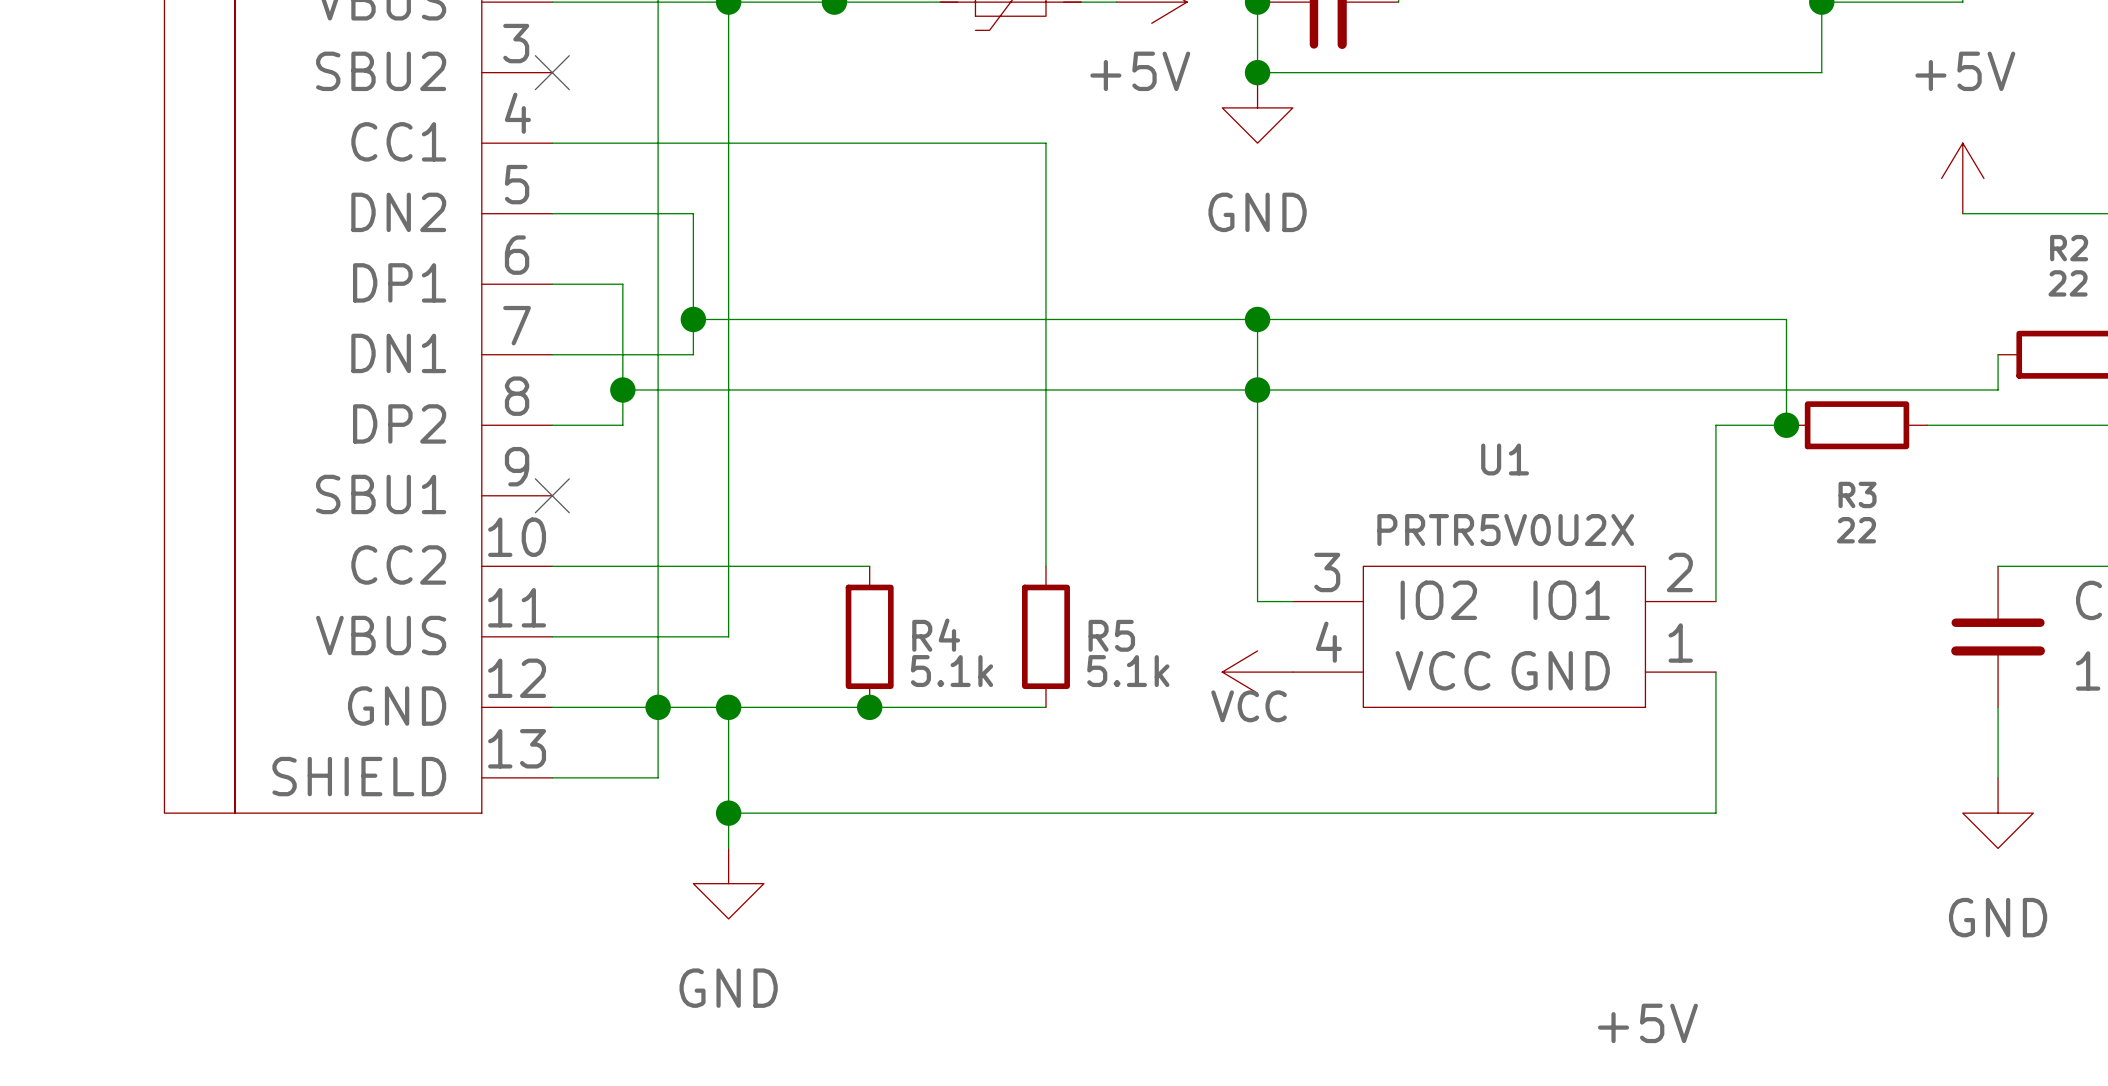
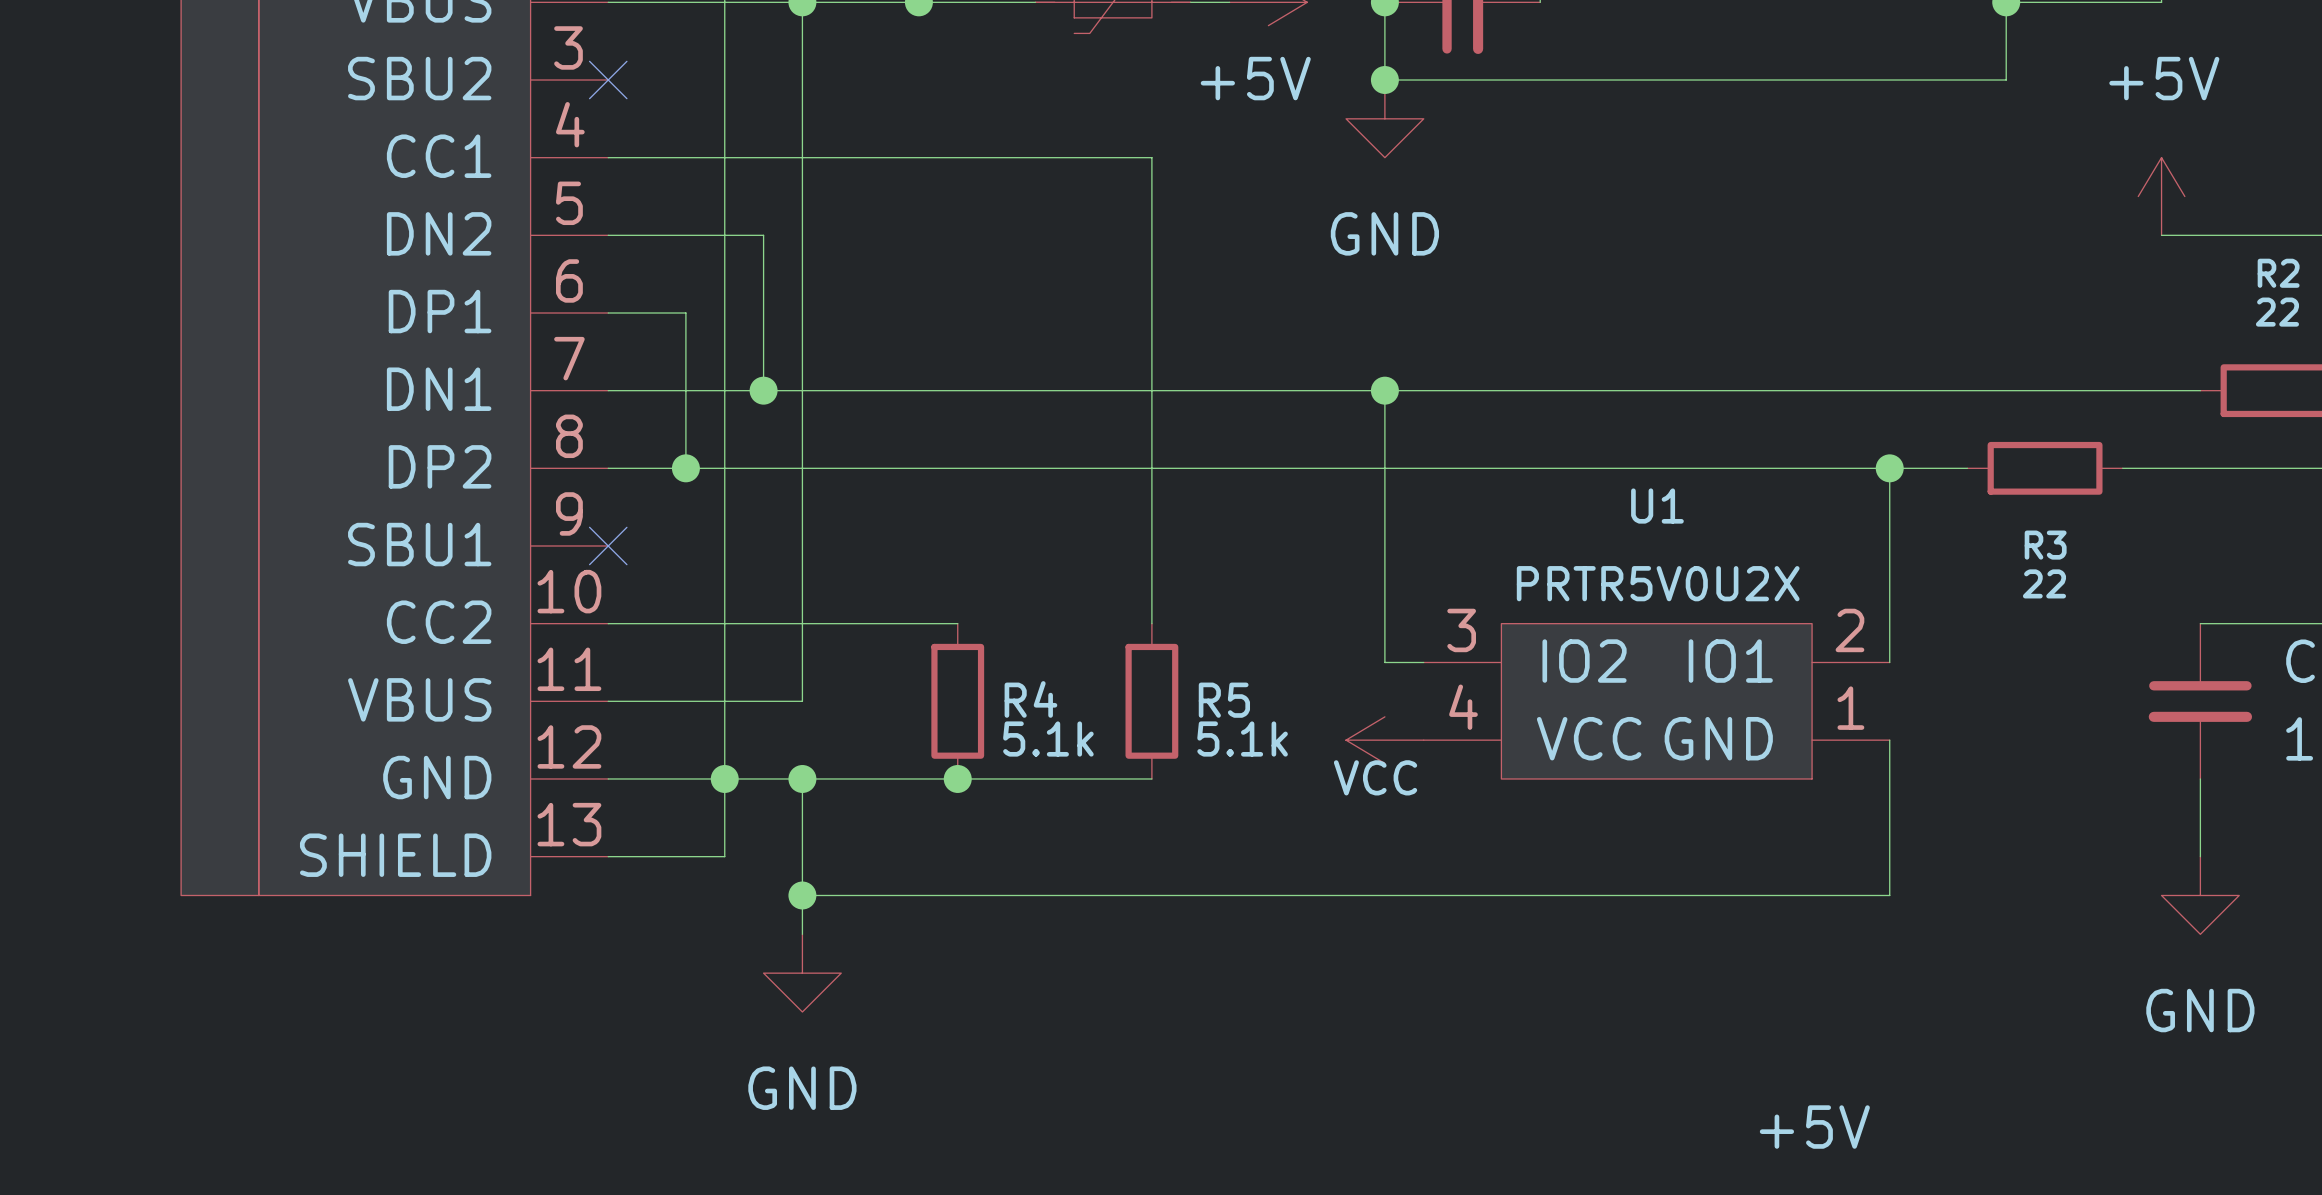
wire: (693, 319) (1786, 319) (1786, 425) -> none
junction position: (693, 319) -> (763, 390)
wire: (1257, 319) (1257, 354) -> none
junction: (1257, 319) -> none
junction: none -> (1384, 390)
wire: (1998, 354) (1998, 390) (622, 390) -> (2200, 390) (763, 390)
junction position: (622, 390) -> (685, 468)
junction: (1257, 390) -> none
wire: none -> (685, 468) (1889, 468)
junction position: (1786, 425) -> (1889, 468)

